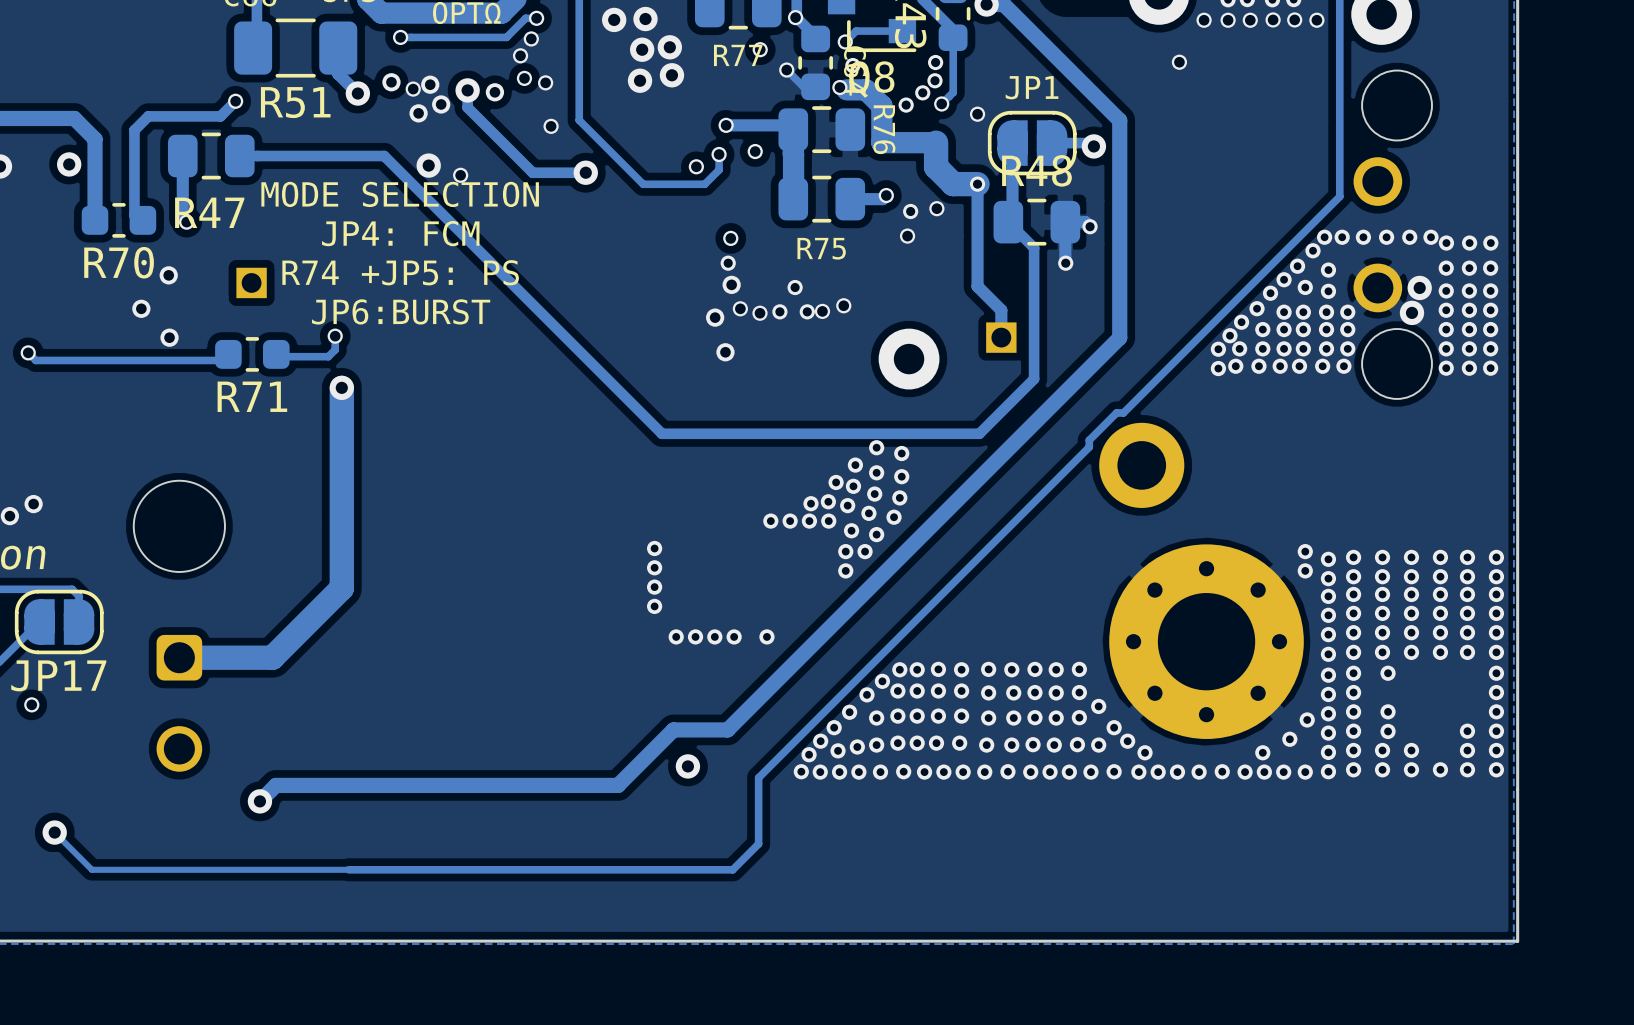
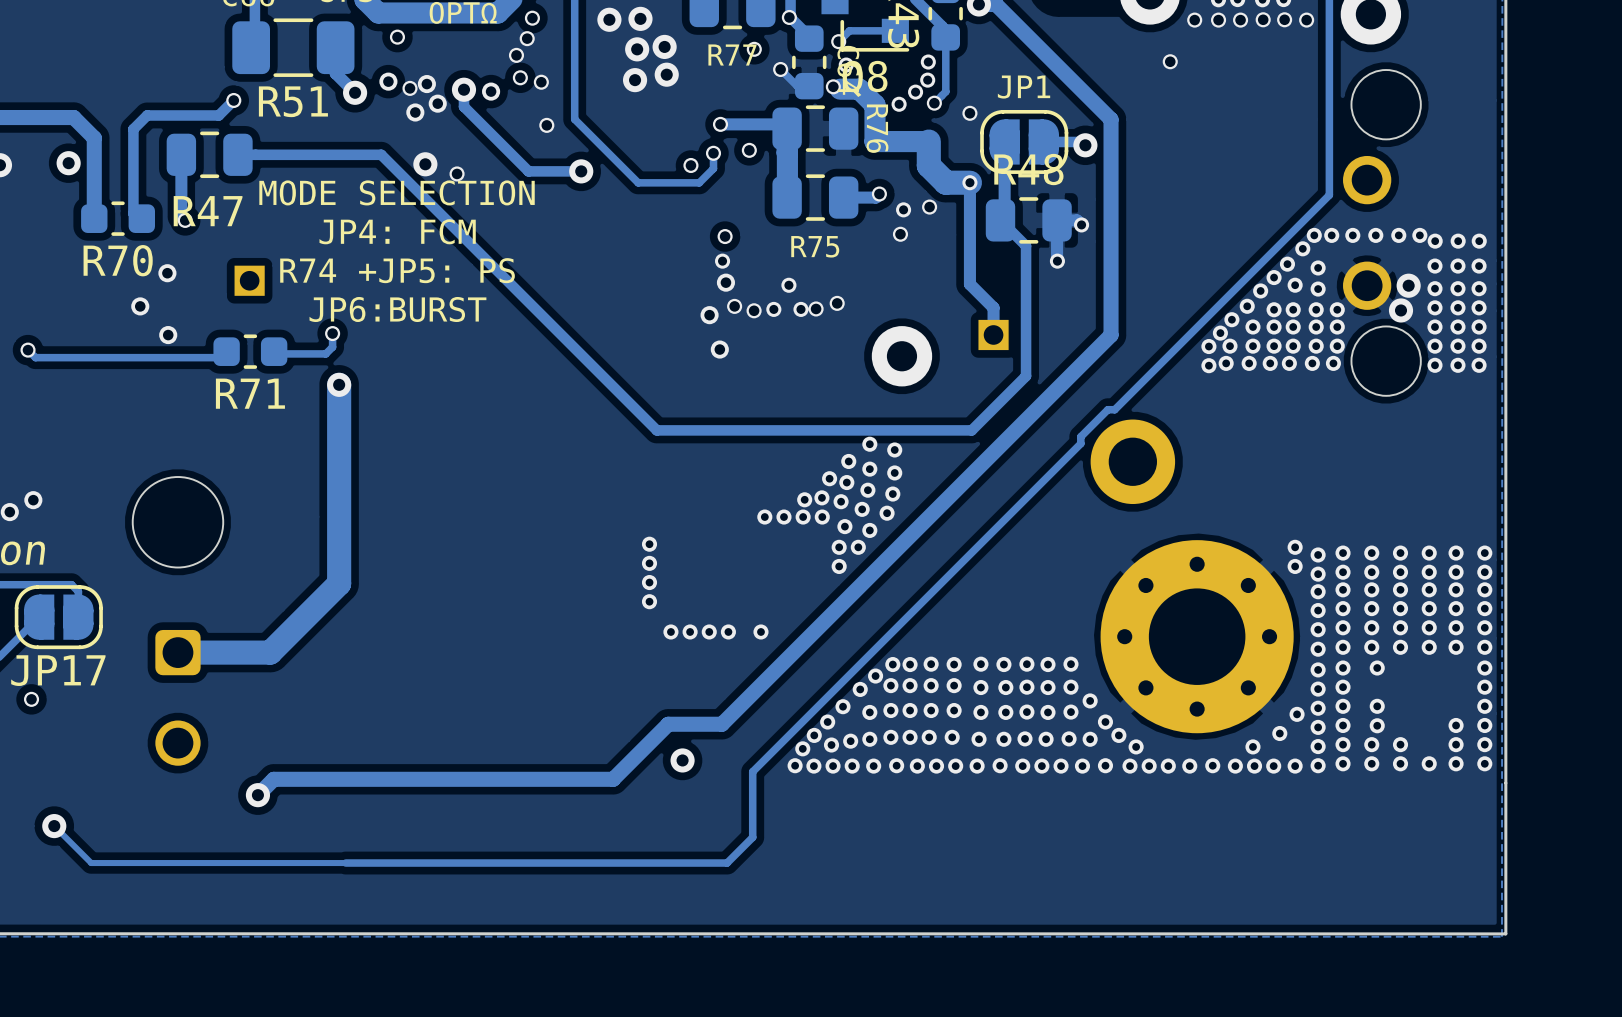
track: (536, 18) (525, 18) (506, 37) (400, 37) -> none

